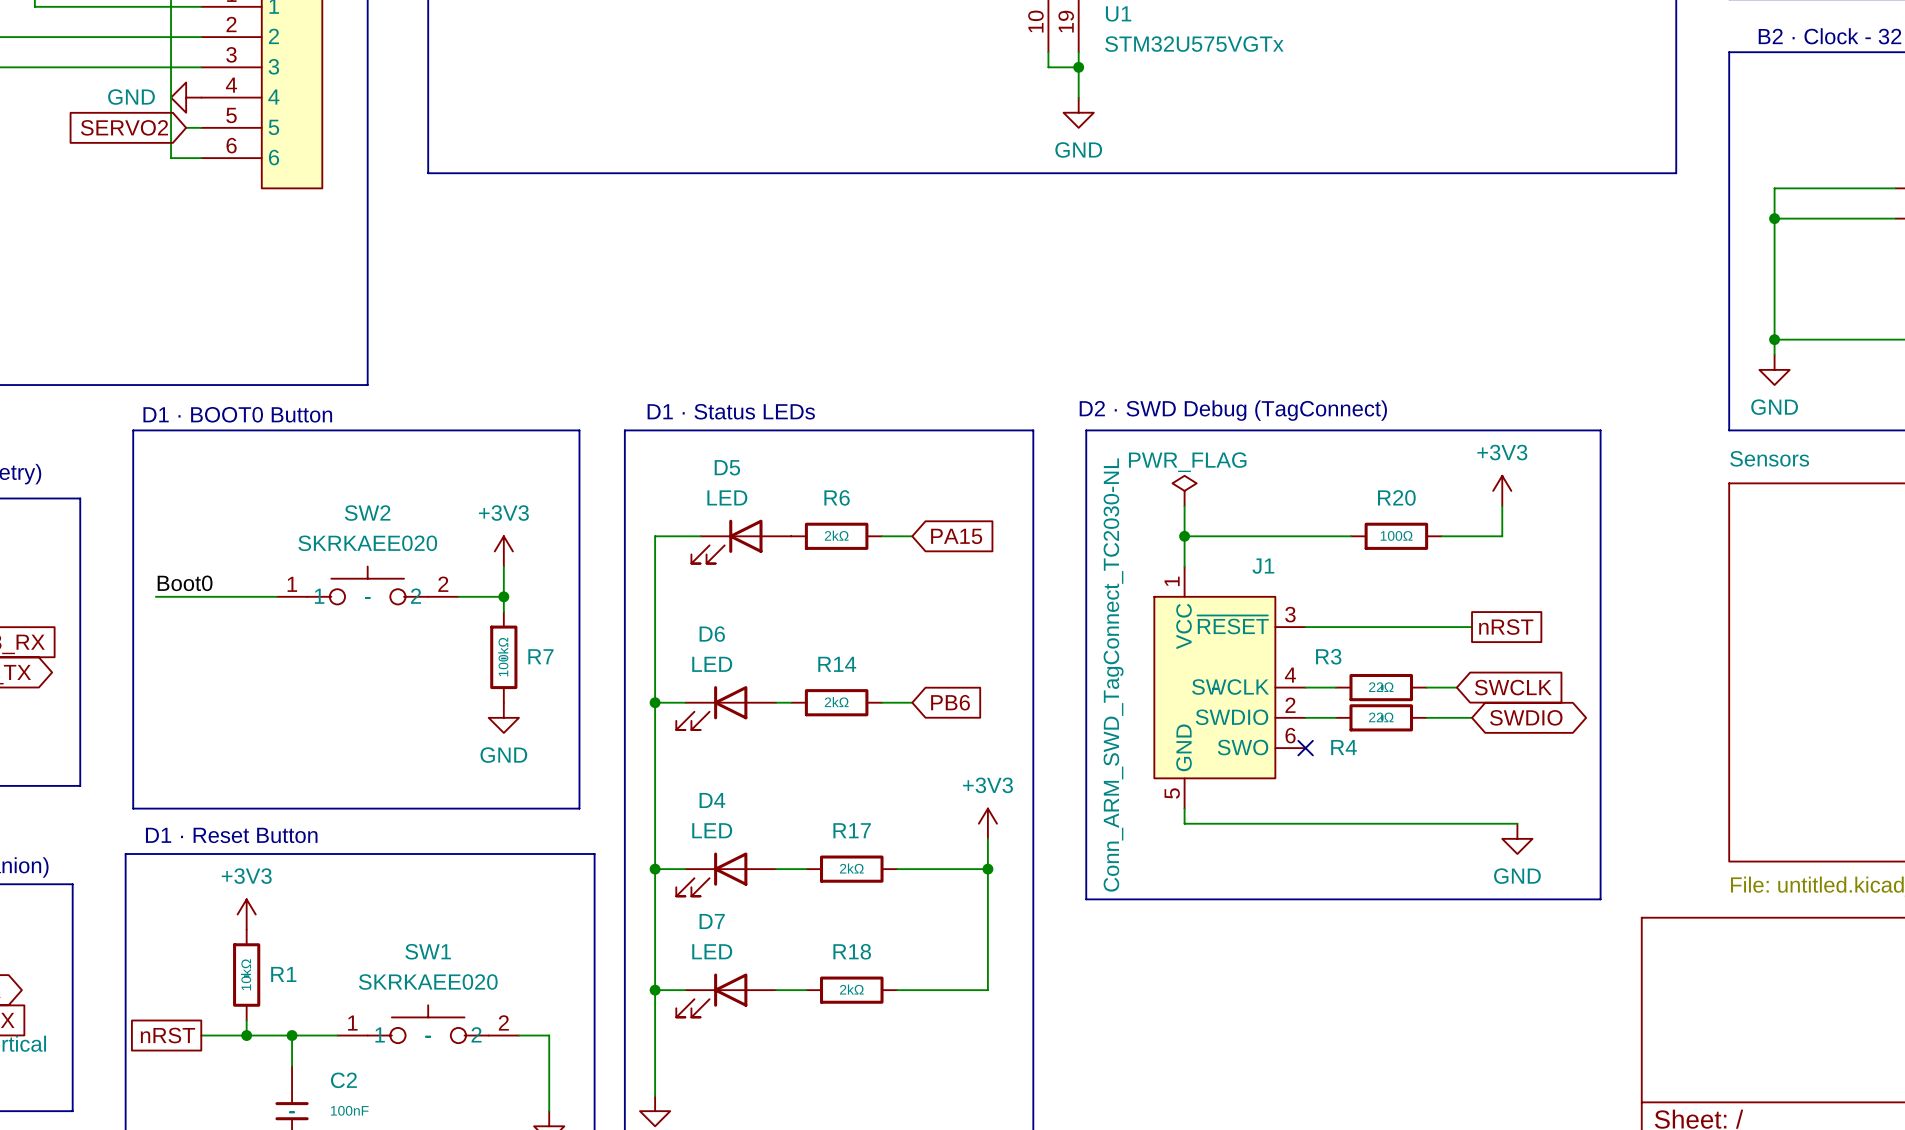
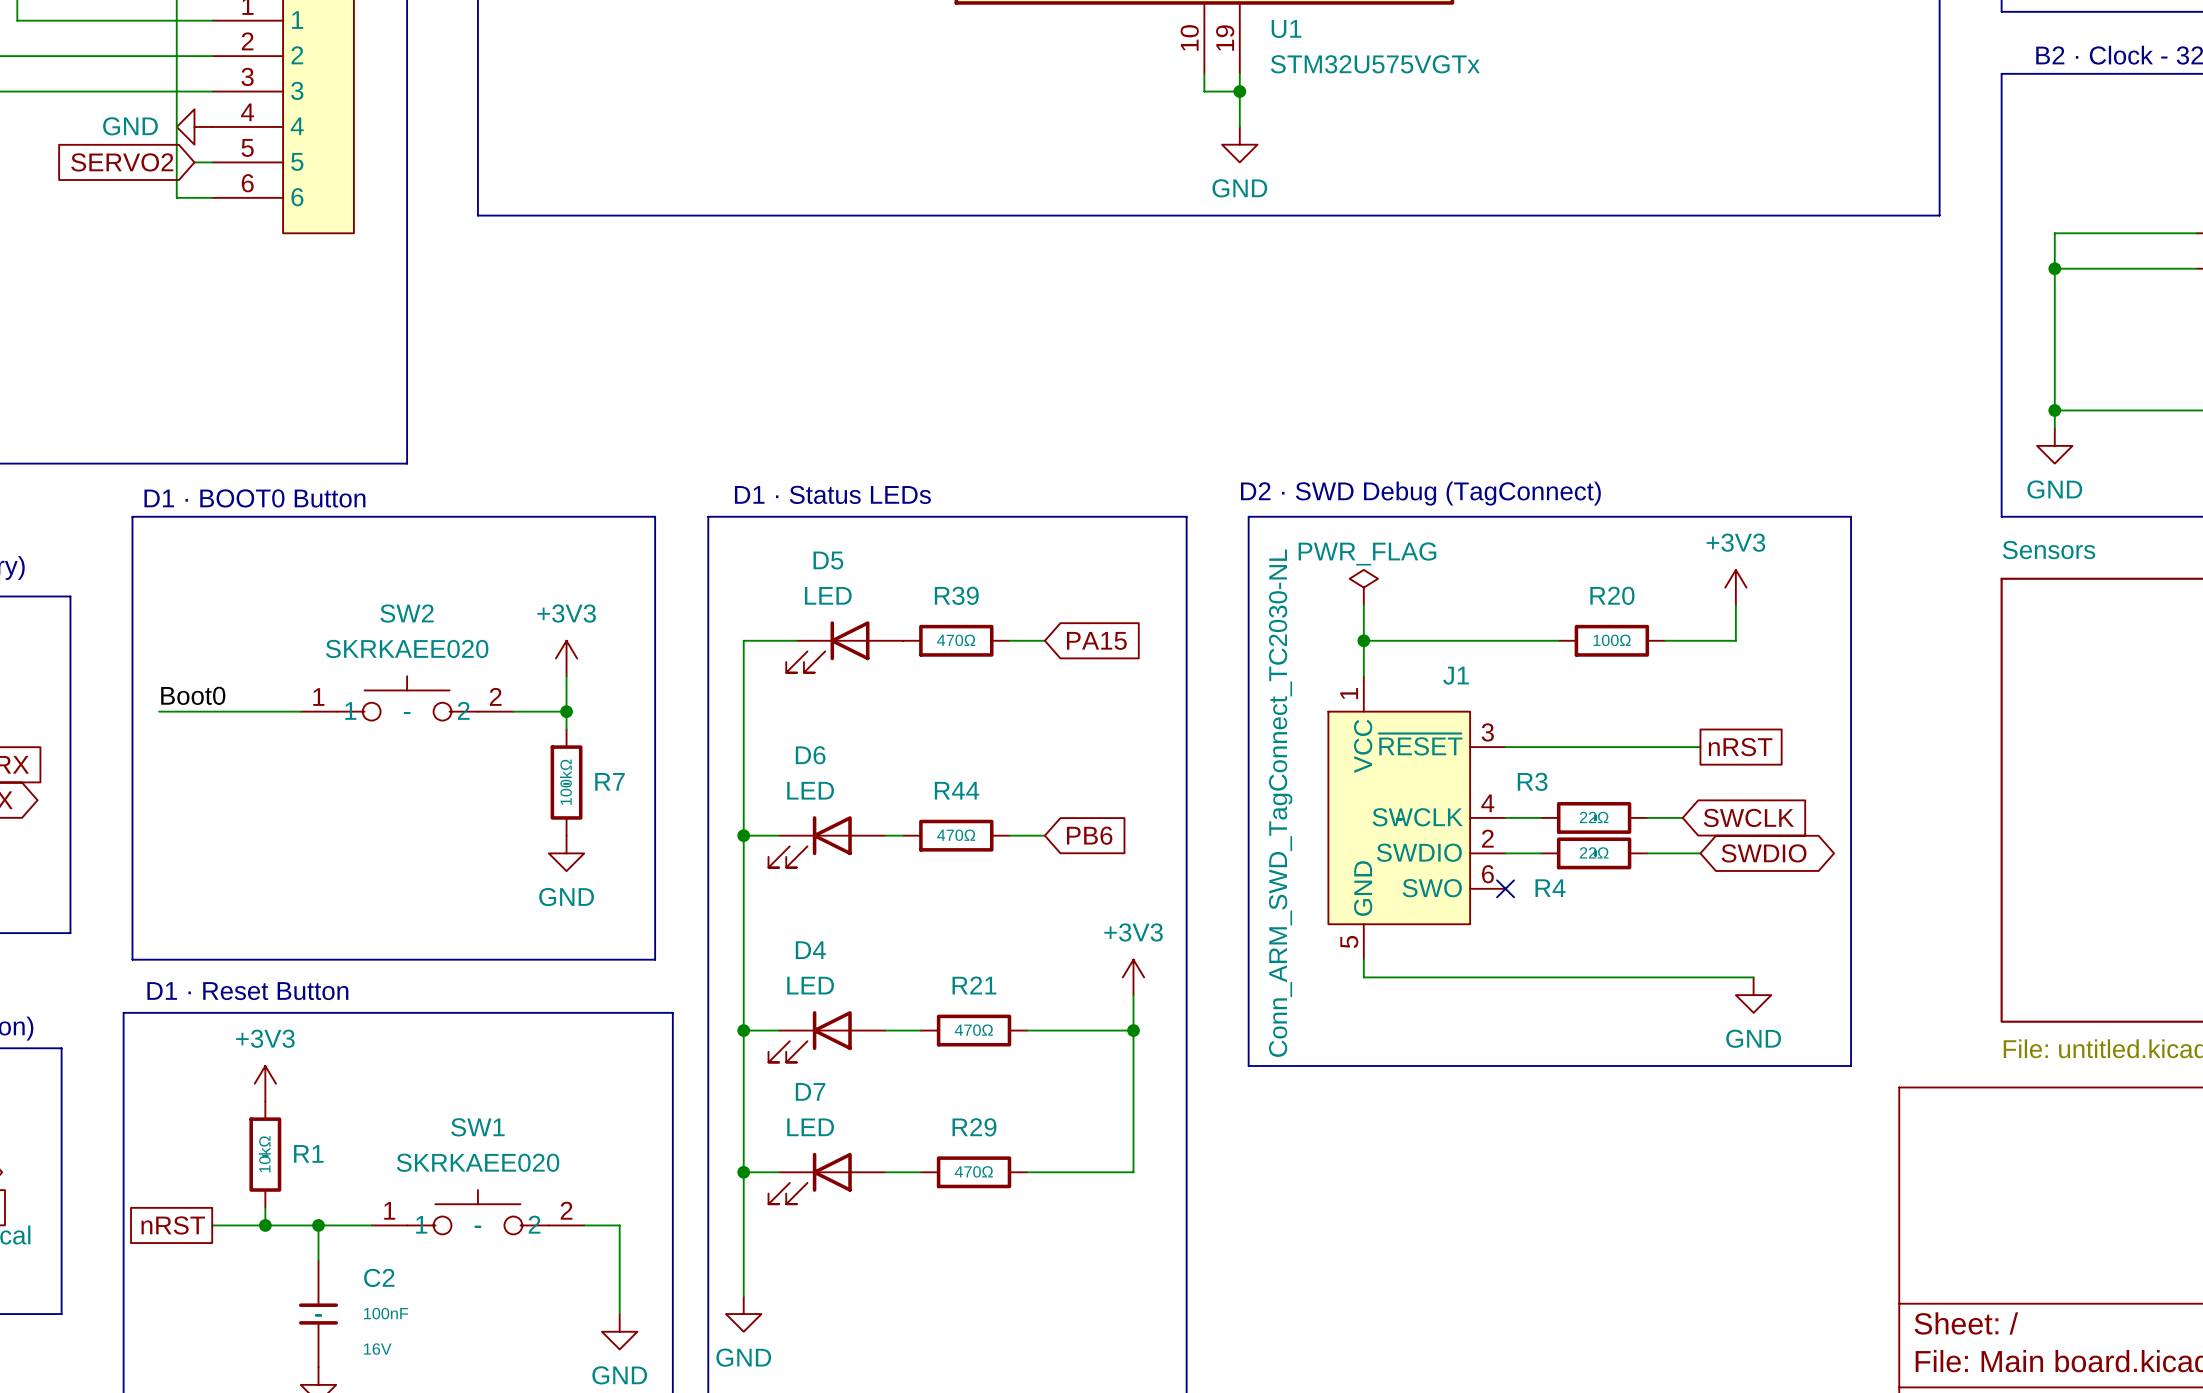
R6 name: R6 (837, 497) -> R39 (956, 595)
R6 value: 2kΩ (836, 535) -> 470Ω (956, 640)
R14 name: R14 (837, 664) -> R44 (957, 790)
R14 value: 2kΩ (836, 702) -> 470Ω (956, 835)
R17 name: R17 (852, 830) -> R21 (974, 985)
R17 value: 2kΩ (851, 868) -> 470Ω (973, 1030)
R18 name: R18 (852, 951) -> R29 (974, 1127)
R18 value: 2kΩ (851, 989) -> 470Ω (973, 1171)

